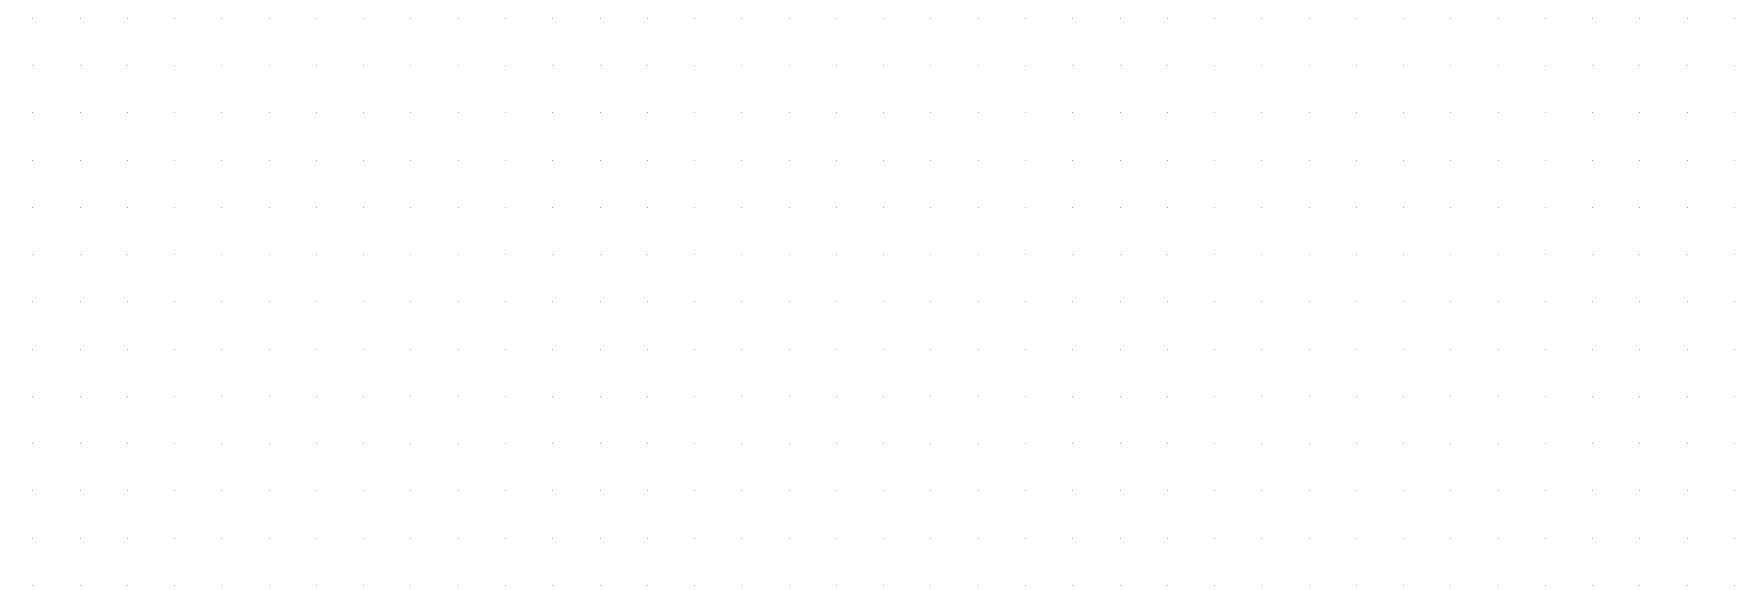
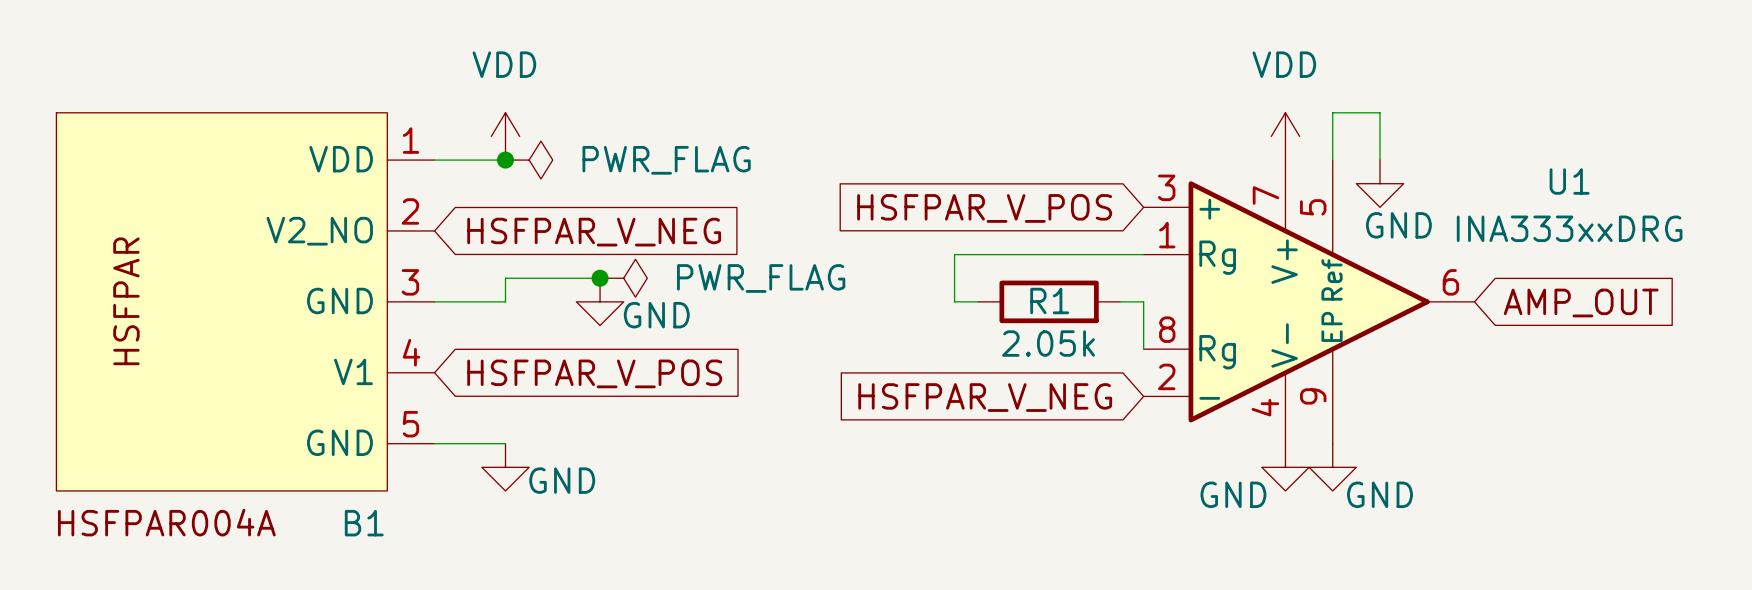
power symbol: none -> VDD (505, 136)
power symbol: none -> VDD (1285, 136)
wire: none -> (434, 160) (505, 160)
junction: none -> (505, 160)
power symbol: none -> PWR_FLAG (529, 160)
wire: none -> (1332, 160) (1332, 112) (1379, 112) (1379, 160)
power symbol: none -> GND (1379, 183)
global label: none -> HSFPAR_V_POS (984, 208)
global label: none -> HSFPAR_V_NEG (594, 232)
wire: none -> (1143, 254) (954, 254) (954, 301) (978, 301)
wire: none -> (600, 278) (505, 278) (505, 301) (434, 301)
junction: none -> (600, 278)
power symbol: none -> PWR_FLAG (623, 278)
B1: none -> (245, 301)
power symbol: none -> GND (600, 301)
R1: none -> 2.05k (1049, 301)
wire: none -> (1120, 301) (1143, 301) (1143, 349)
U1: none -> INA333xxDRG (1309, 301)
global label: none -> AMP_OUT (1581, 303)
global label: none -> HSFPAR_V_POS (594, 373)
global label: none -> HSFPAR_V_NEG (985, 397)
wire: none -> (434, 443) (505, 443)
power symbol: none -> GND (505, 467)
power symbol: none -> GND (1285, 467)
power symbol: none -> GND (1332, 467)

